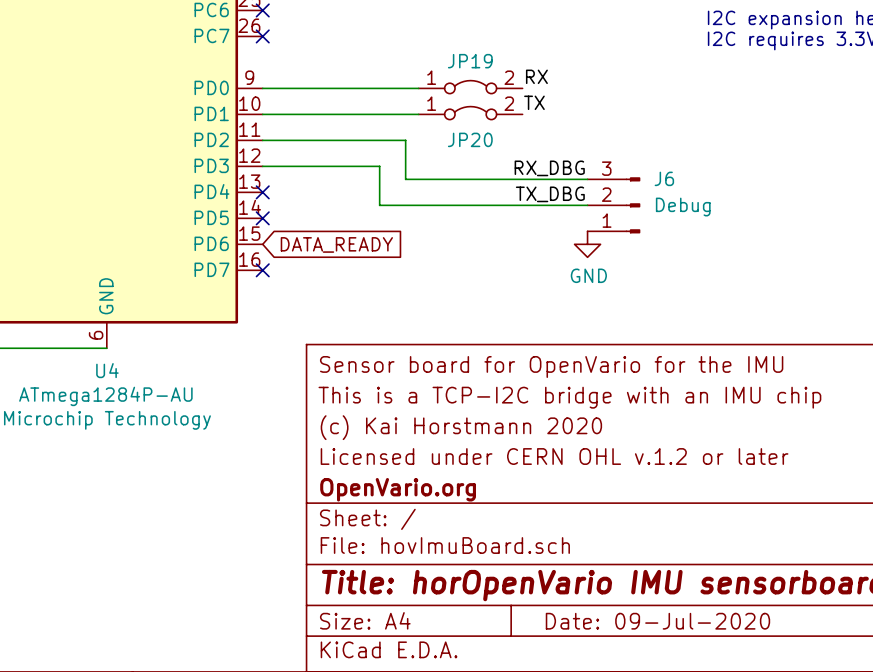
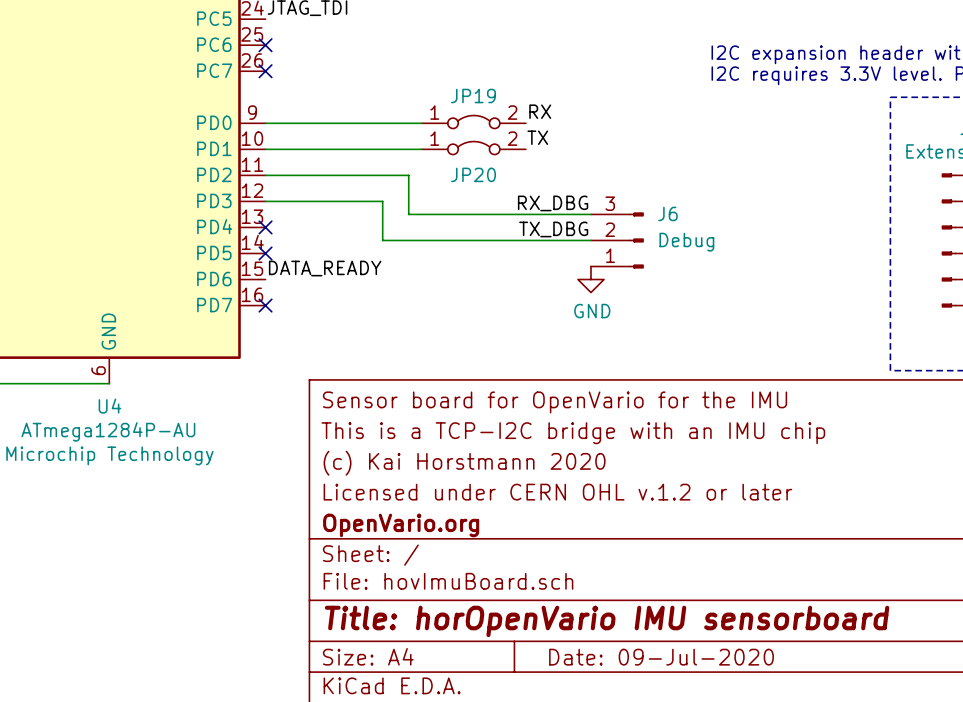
label: none -> DATA_READY (325, 268)
global label: DATA_READY (336, 244) -> none

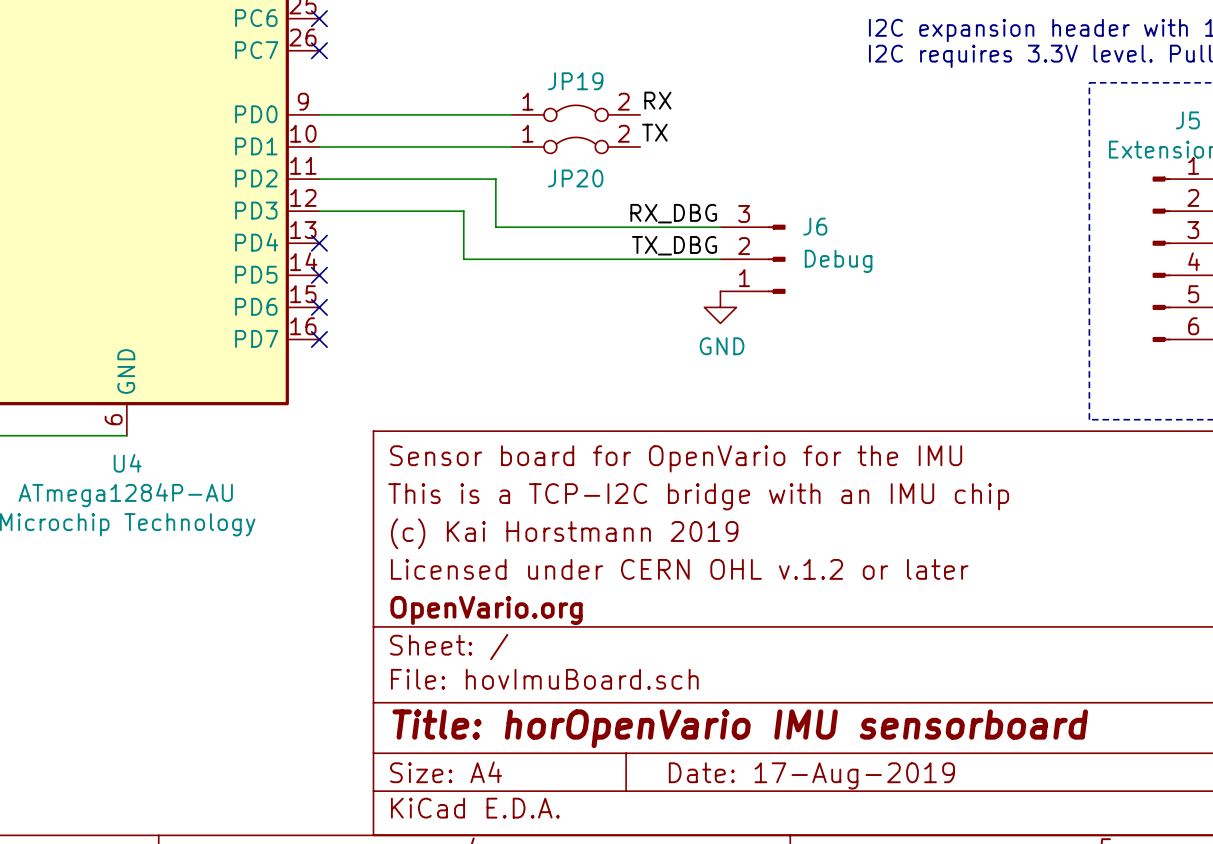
label: DATA_READY (325, 268) -> none
no-connect mark: none -> (319, 307)
title block: (c) Kai Horstmann 2020 (464, 463) -> (c) Kai Horstmann 2019 (564, 533)
title block: Date: 09-Jul-2020 (661, 657) -> Date: 17-Aug-2019 (811, 775)

